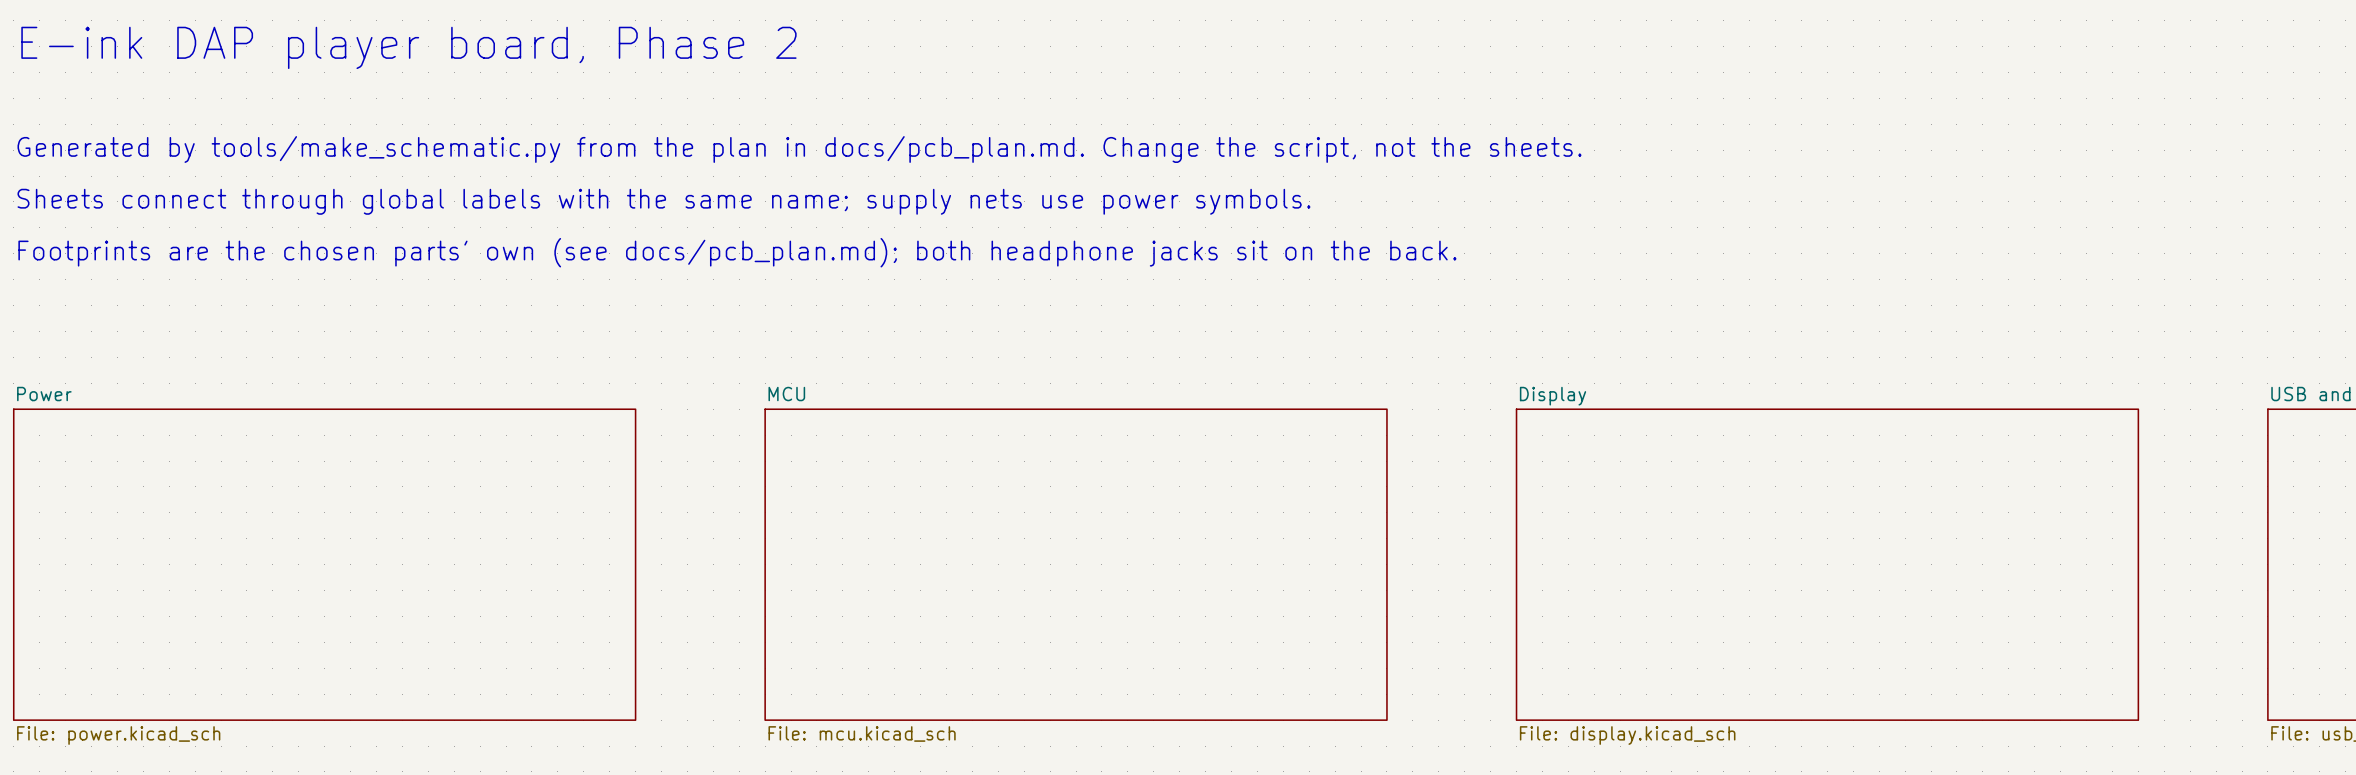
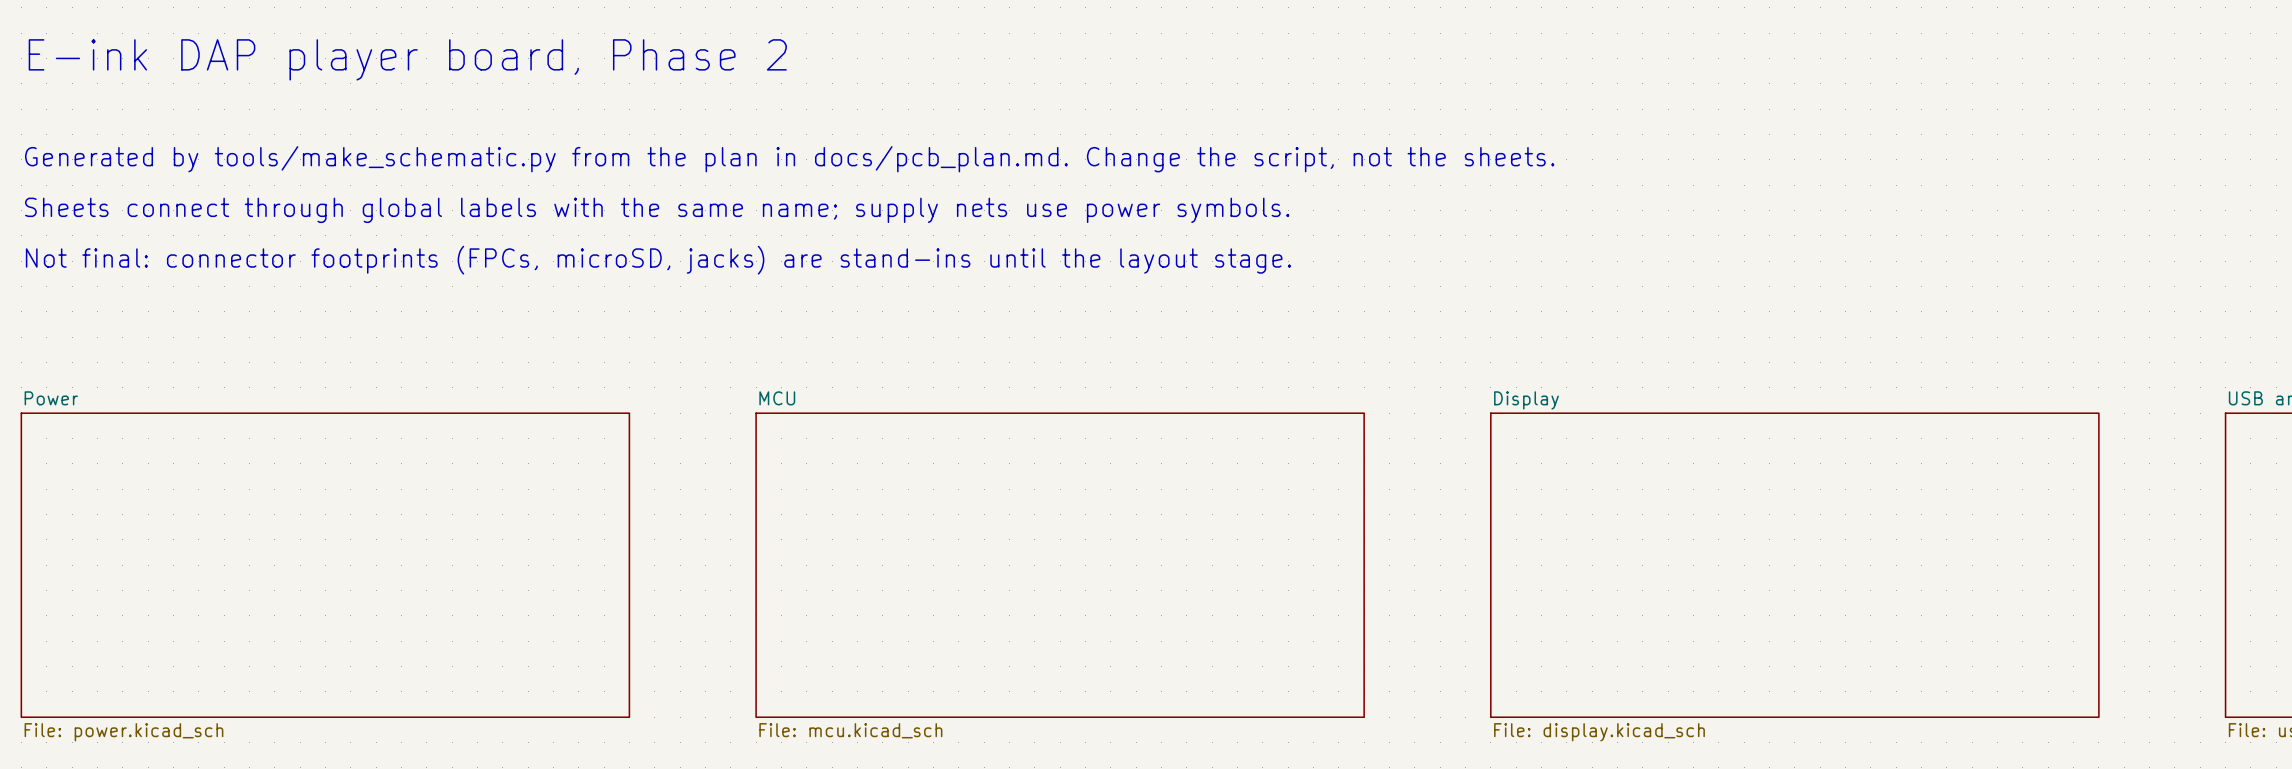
text: Footprints are the chosen parts' own (see docs/pcb_plan.md); both headphone jacks sit on the back. (737, 252) -> Not final: connector footprints (FPCs, microSD, jacks) are stand-ins until the layout stage. (658, 260)

